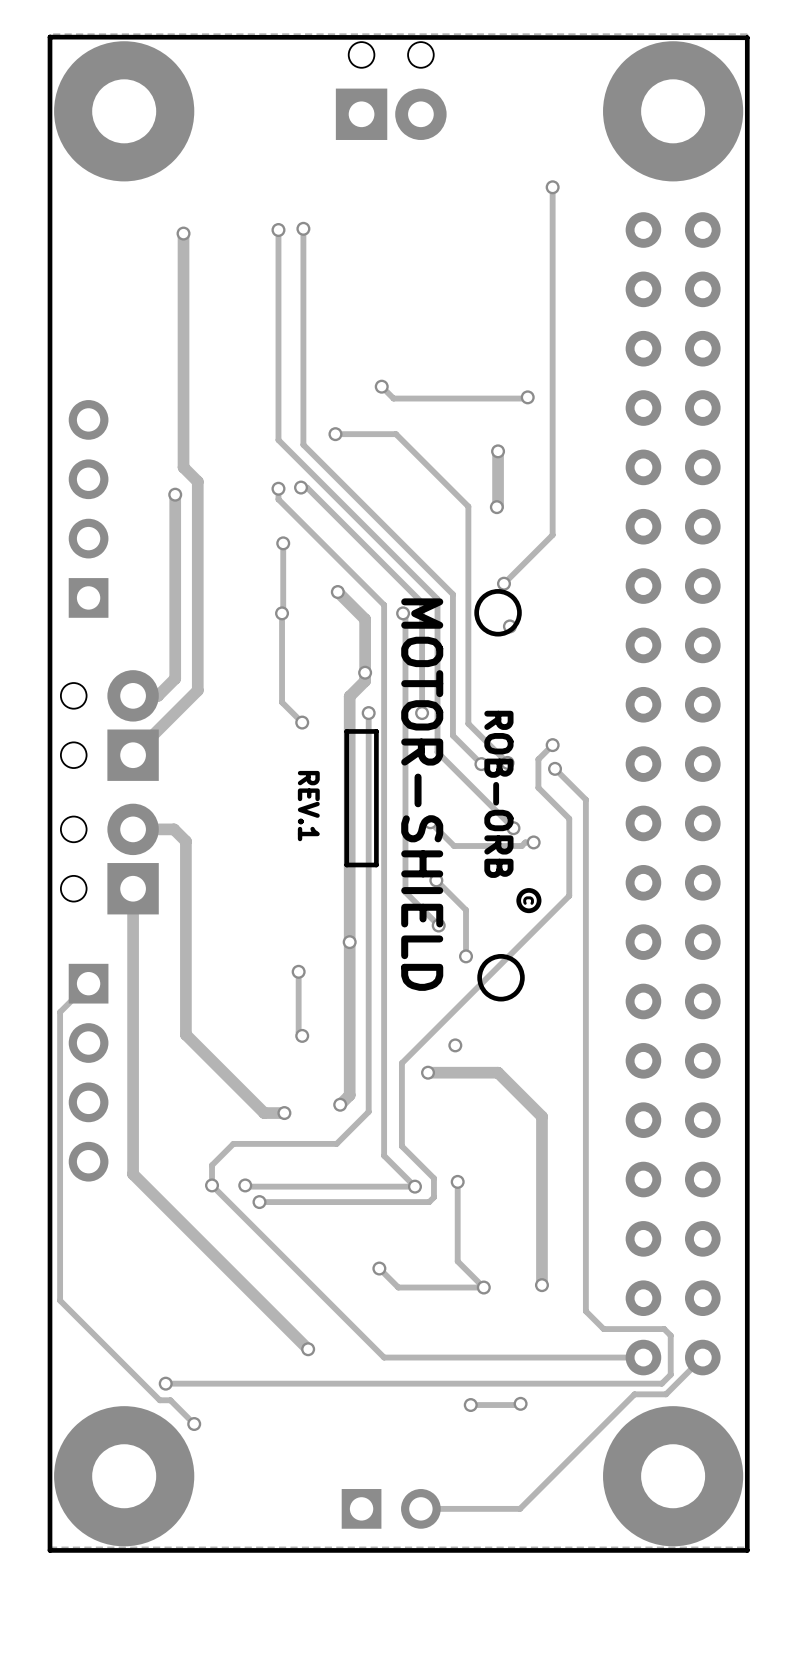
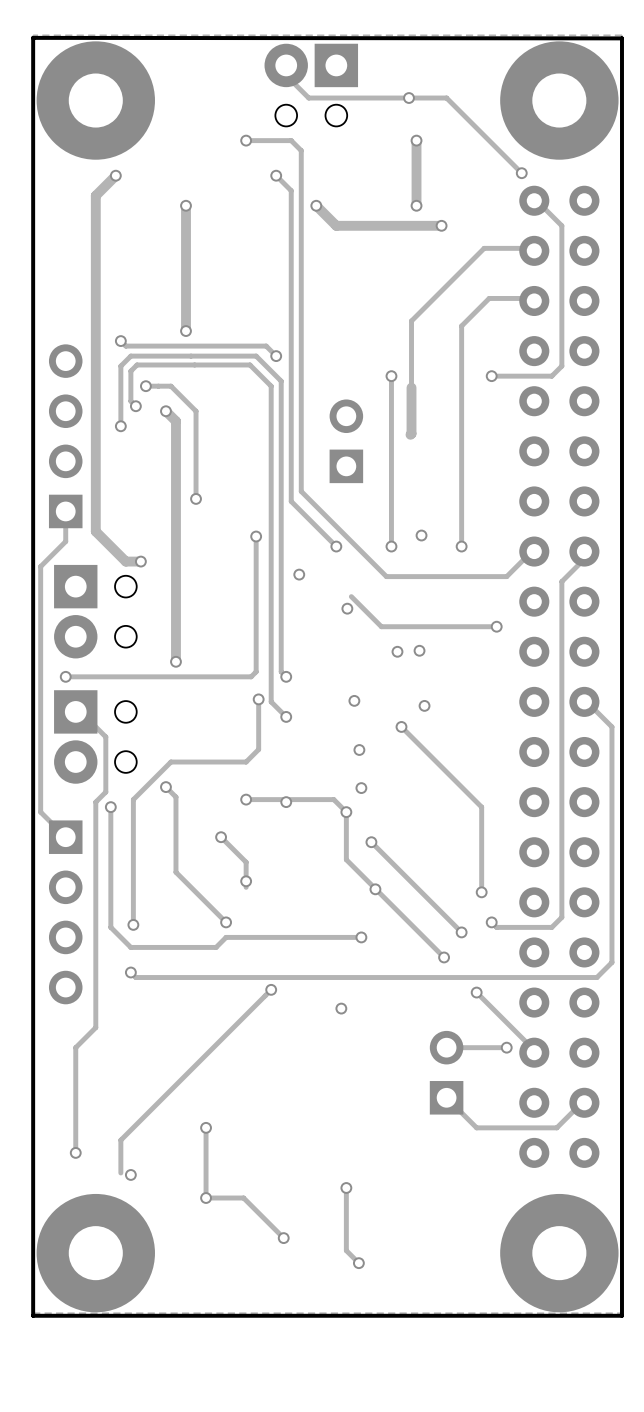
track: none -> (286, 65) (286, 75) (308, 98) (446, 98) (521, 173)
part rotation: 0° (391, 91) -> 180° (311, 85)
via: none -> (409, 98)
track: none -> (246, 140) (291, 140) (301, 150) (301, 491) (386, 576) (506, 576) (534, 549)
via: none -> (246, 140)
track: none -> (416, 140) (416, 205)
via: none -> (416, 140)
track: (552, 187) (552, 535) (503, 583) -> none
via: (552, 187) -> none
via: none -> (521, 173)
track: none -> (115, 175) (95, 195) (95, 531) (125, 561) (140, 561)
via: none -> (115, 175)
track: none -> (276, 175) (291, 190) (291, 501) (336, 546)
via: none -> (276, 175)
track: none -> (534, 198) (561, 225) (561, 366) (551, 376) (491, 376)
track: (303, 228) (303, 444) (452, 594) (452, 735) (481, 764) -> none
via: (303, 228) -> none
track: (278, 230) (278, 440) (437, 599) (437, 752) (513, 828) -> none
via: (278, 230) -> none
track: (183, 233) (183, 467) (197, 481) (197, 690) (133, 755) -> none
via: (183, 233) -> none
track: none -> (186, 205) (186, 331)
via: none -> (186, 205)
track: none -> (316, 205) (336, 225) (441, 225)
via: none -> (316, 205)
via: none -> (416, 205)
via: none -> (441, 225)
track: none -> (534, 248) (484, 248) (411, 321) (411, 387)
track: none -> (534, 298) (489, 298) (461, 326) (461, 546)
via: none -> (186, 331)
track: (381, 386) (393, 398) (527, 397) -> none
via: (381, 386) -> none
track: none -> (120, 341) (125, 346) (266, 346) (276, 356)
via: none -> (120, 341)
via: (527, 397) -> none
track: (335, 434) (395, 434) (468, 506) (468, 723) (507, 762) -> none
via position: (335, 434) -> (276, 356)
track: none -> (391, 376) (391, 546)
via: none -> (491, 376)
track: none -> (145, 386) (170, 386) (196, 411) (196, 498)
via: none -> (145, 386)
via position: (498, 451) -> (391, 376)
track: none -> (135, 406) (130, 401) (130, 371) (137, 364) (250, 364) (271, 386) (271, 701) (286, 716)
via: none -> (135, 406)
track: none -> (165, 411) (175, 421) (175, 661)
via: none -> (165, 411)
track: (301, 487) (306, 487) (422, 602) (422, 713) -> none
via: (301, 487) -> none
track: (278, 488) (278, 499) (384, 605) (384, 1155) (414, 1186) (245, 1185) -> none
via: (278, 488) -> none
track: (175, 494) (175, 678) (158, 695) (133, 695) -> none
via: (175, 494) -> none
track: none -> (120, 426) (120, 366) (130, 356) (256, 356) (281, 381) (281, 671) (286, 676)
via: none -> (120, 426)
via: (496, 507) -> none
part: none -> (346, 441)
track: (283, 543) (282, 702) (302, 722) -> none
via: (283, 543) -> none
via: none -> (196, 498)
via: (503, 583) -> none
drawing: [474, 589, 522, 637] -> none
track: (337, 592) (365, 619) (365, 681) (349, 696) (349, 1095) (340, 1104) -> none
via: (337, 592) -> none
via: (282, 613) -> none
track: (403, 613) (405, 615) (405, 892) (438, 925) -> none
via position: (403, 613) -> (336, 546)
track: none -> (256, 536) (256, 671) (251, 676) (65, 676)
via: none -> (256, 536)
via: none -> (391, 546)
via: none -> (461, 546)
track: none -> (584, 549) (584, 559) (561, 581) (561, 917) (551, 927) (496, 927) (491, 922)
via: none -> (140, 561)
track: none -> (351, 596) (381, 626) (496, 626)
track: (368, 713) (368, 1111) (336, 1143) (233, 1143) (212, 1165) (212, 1185) (384, 1357) (643, 1357) -> none
via: (368, 713) -> none
via: (302, 722) -> none
part rotation: 0° (109, 725) -> 180° (95, 611)
line: (376, 731) (346, 731) (346, 864) (376, 864) (376, 731) -> none
via: none -> (496, 626)
track: (552, 745) (538, 759) (538, 787) (569, 818) (569, 895) (401, 1063) (401, 1146) (433, 1178) (433, 1197) (429, 1202) (259, 1202) -> none
via: (552, 745) -> none
track: (555, 768) (585, 799) (585, 1311) (603, 1329) (664, 1329) (670, 1335) (670, 1374) (661, 1383) (165, 1383) -> none
via: (555, 768) -> none
via: none -> (175, 661)
via: none -> (65, 676)
via: none -> (286, 676)
text: MOTOR-SHIELD (422, 794) -> none
text: ROB-ORB (498, 794) -> none
text: REV.1 (308, 806) -> none
track: none -> (258, 699) (258, 749) (246, 762) (170, 762) (133, 799) (133, 924)
via: none -> (258, 699)
track: none -> (584, 699) (611, 726) (611, 962) (596, 977) (135, 977) (130, 972)
track: (430, 822) (454, 846) (521, 846) (525, 842) (533, 842) -> none
track: (133, 829) (174, 829) (185, 841) (185, 1034) (264, 1113) (284, 1113) -> none
track: none -> (75, 711) (80, 711) (105, 736) (105, 792) (95, 802) (95, 1027) (75, 1047) (75, 1152)
via: none -> (286, 716)
via position: (533, 842) -> (401, 726)
track: none -> (401, 726) (481, 807) (481, 892)
part rotation: 0° (109, 859) -> 180° (95, 736)
track: (436, 880) (466, 910) (466, 956) -> none
track: (133, 888) (133, 1174) (308, 1349) -> none
drawing: [516, 888, 542, 914] -> none
text: c (528, 900) -> none
track: none -> (165, 787) (175, 797) (175, 872) (226, 922)
via: none -> (165, 787)
track: none -> (246, 799) (333, 799) (346, 812) (346, 859) (444, 957)
via: none -> (246, 799)
track: none -> (110, 807) (110, 927) (130, 947) (216, 947) (226, 937) (361, 937)
via: none -> (110, 807)
via: none -> (346, 812)
drawing: [477, 954, 525, 1002] -> none
via: (466, 956) -> none
track: (298, 971) (298, 1032) (302, 1035) -> none
via: (298, 971) -> none
track: (88, 983) (60, 1012) (60, 1300) (159, 1400) (170, 1400) (194, 1424) -> (65, 837) (40, 812) (40, 566) (65, 541) (65, 511)
track: none -> (221, 837) (246, 862) (246, 887)
via: none -> (221, 837)
track: none -> (371, 842) (461, 932)
via: none -> (371, 842)
via: none -> (481, 892)
track: (428, 1072) (498, 1072) (541, 1116) (541, 1285) -> none
via position: (428, 1072) -> (361, 937)
via: none -> (491, 922)
via: none -> (133, 924)
via: none -> (461, 932)
via: (340, 1104) -> none
via position: (284, 1113) -> (226, 922)
via: none -> (444, 957)
via: none -> (130, 972)
track: none -> (271, 989) (120, 1140) (120, 1172)
via: none -> (271, 989)
track: none -> (476, 992) (534, 1050)
via: none -> (476, 992)
track: (457, 1181) (457, 1261) (483, 1287) (398, 1287) (379, 1268) -> none
via: (457, 1181) -> none
via: (212, 1185) -> none
via: (245, 1185) -> none
via: (259, 1202) -> none
track: none -> (506, 1047) (446, 1047)
via: none -> (506, 1047)
via: (379, 1268) -> none
via: (541, 1285) -> none
via: (483, 1287) -> none
track: none -> (446, 1097) (476, 1127) (556, 1127) (584, 1100)
track: none -> (206, 1127) (206, 1198) (243, 1198) (283, 1238)
via: none -> (206, 1127)
via: (308, 1349) -> none
via: none -> (75, 1152)
track: (702, 1357) (666, 1394) (634, 1394) (520, 1508) (420, 1508) -> none
track: none -> (346, 1187) (346, 1250) (358, 1263)
via: none -> (346, 1187)
track: (520, 1403) (470, 1405) -> none
via: (520, 1403) -> none
via: (470, 1405) -> none
via: none -> (206, 1198)
via: (194, 1424) -> none
via: none -> (283, 1238)
via: none -> (358, 1263)
part rotation: 0° (391, 1508) -> 90° counterclockwise (446, 1072)
part position: (391, 1508) -> (446, 1072)

